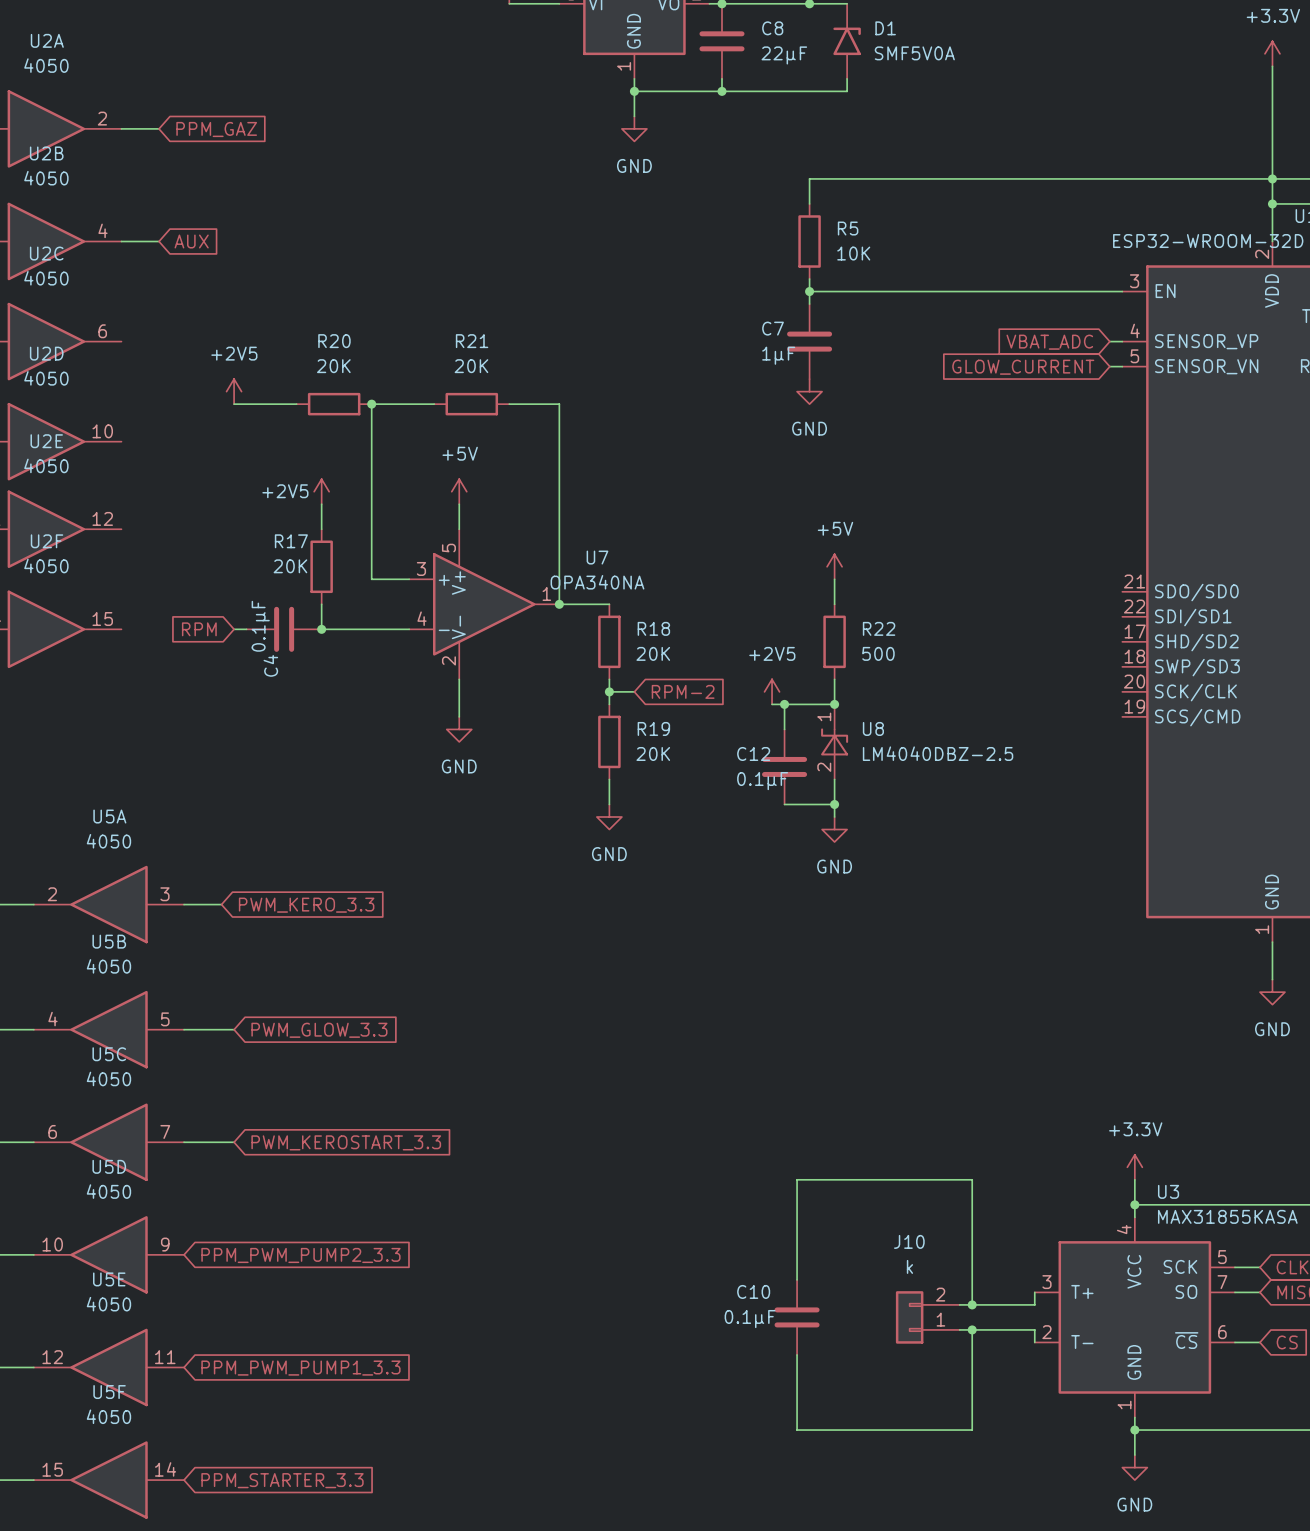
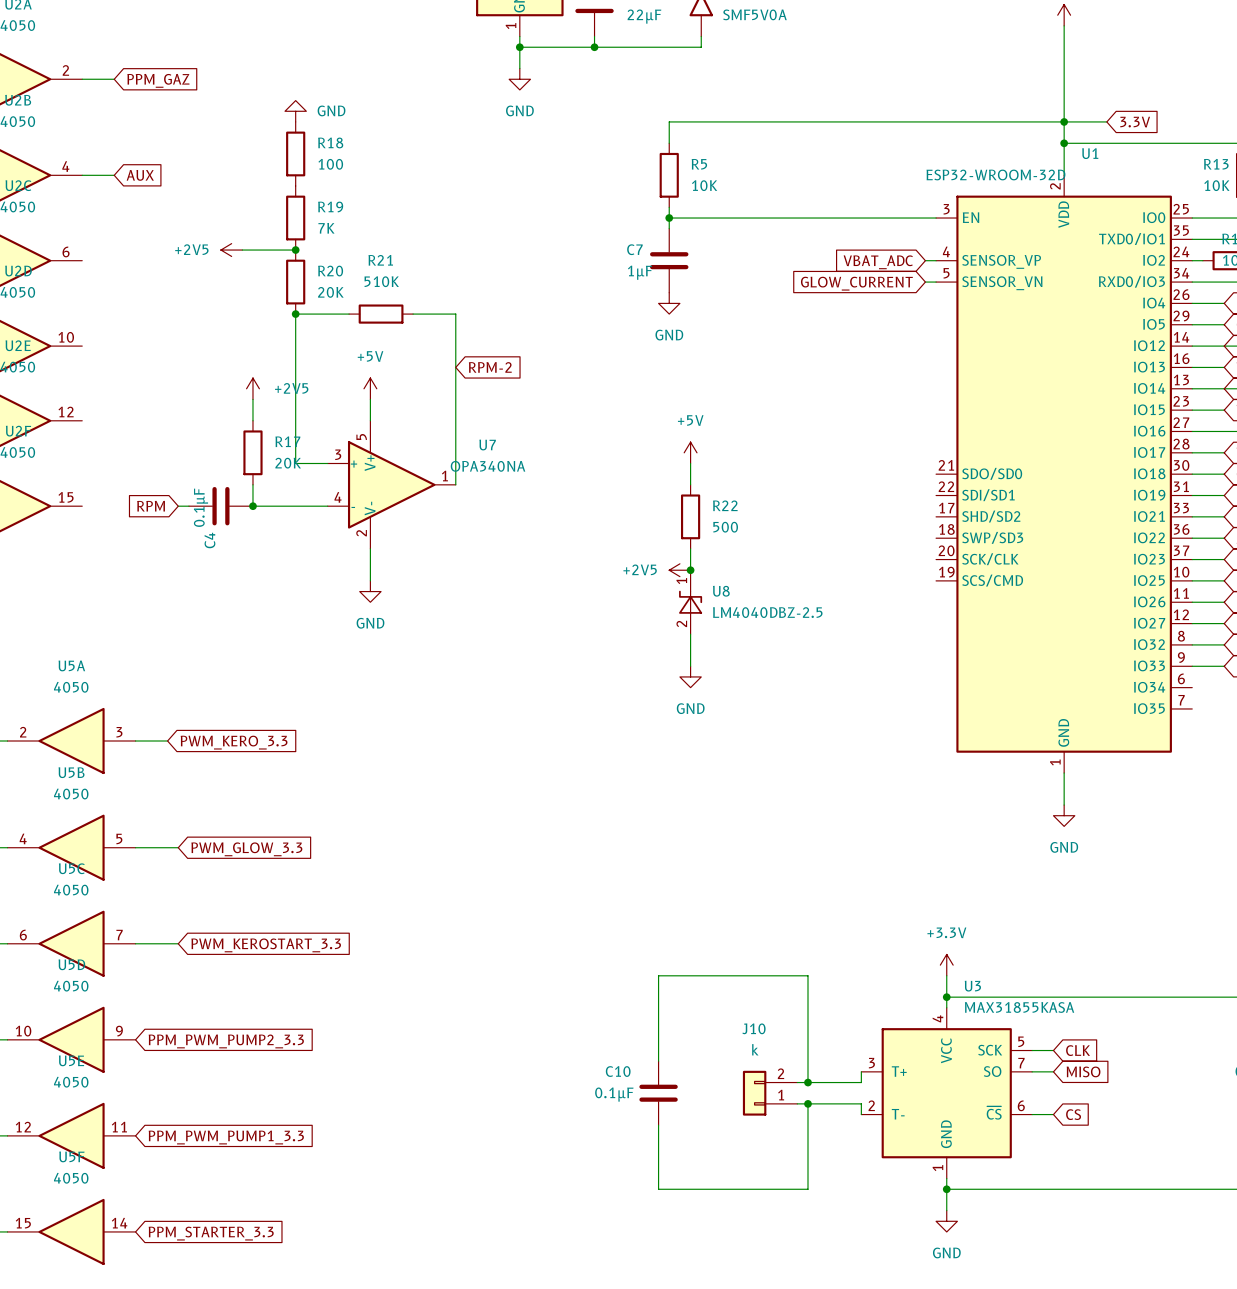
power symbol: none -> GND (295, 111)
junction: none -> (295, 250)
R20 name position: R20 (334, 341) -> R20 (330, 271)
R21 value: 20K (471, 366) -> 510K (381, 281)
power symbol rotation: 0° (234, 391) -> 90° counterclockwise (231, 250)
power symbol position: +2V5 (234, 391) -> +2V5 (231, 250)
wire: (234, 404) (296, 404) -> (242, 250) (295, 250)
R20 rotation: 0° (334, 404) -> 90° clockwise (295, 282)
R20 position: (334, 404) -> (295, 282)
power symbol text position: +2V5 (285, 491) -> +2V5 (291, 388)
R17 name position: R17 (291, 541) -> R17 (287, 441)
R17 value position: 20K (290, 566) -> 20K (288, 463)
wire: (559, 604) (609, 604) -> none
junction: (559, 604) -> none
R18 position: (609, 641) -> (295, 153)
R18 value: 20K (653, 653) -> 100 (330, 164)
wire: (609, 679) (609, 704) -> none
wire: (609, 691) (634, 691) -> none
junction: (609, 691) -> none
global label position: RPM-2 (683, 691) -> RPM-2 (490, 367)
power symbol rotation: 0° (772, 691) -> 90° counterclockwise (679, 570)
power symbol position: +2V5 (772, 691) -> +2V5 (679, 570)
wire: (772, 704) (834, 704) -> none
wire: (784, 704) (784, 729) -> none
junction: (784, 704) -> none
R19 position: (609, 741) -> (295, 218)
R19 value: 20K (653, 753) -> 7K (326, 228)
C12: 0.1µF (784, 766) -> none
wire: (609, 779) (609, 804) -> none
wire: (784, 804) (834, 804) -> none
junction: (834, 804) -> none
power symbol: GND (609, 817) -> none

